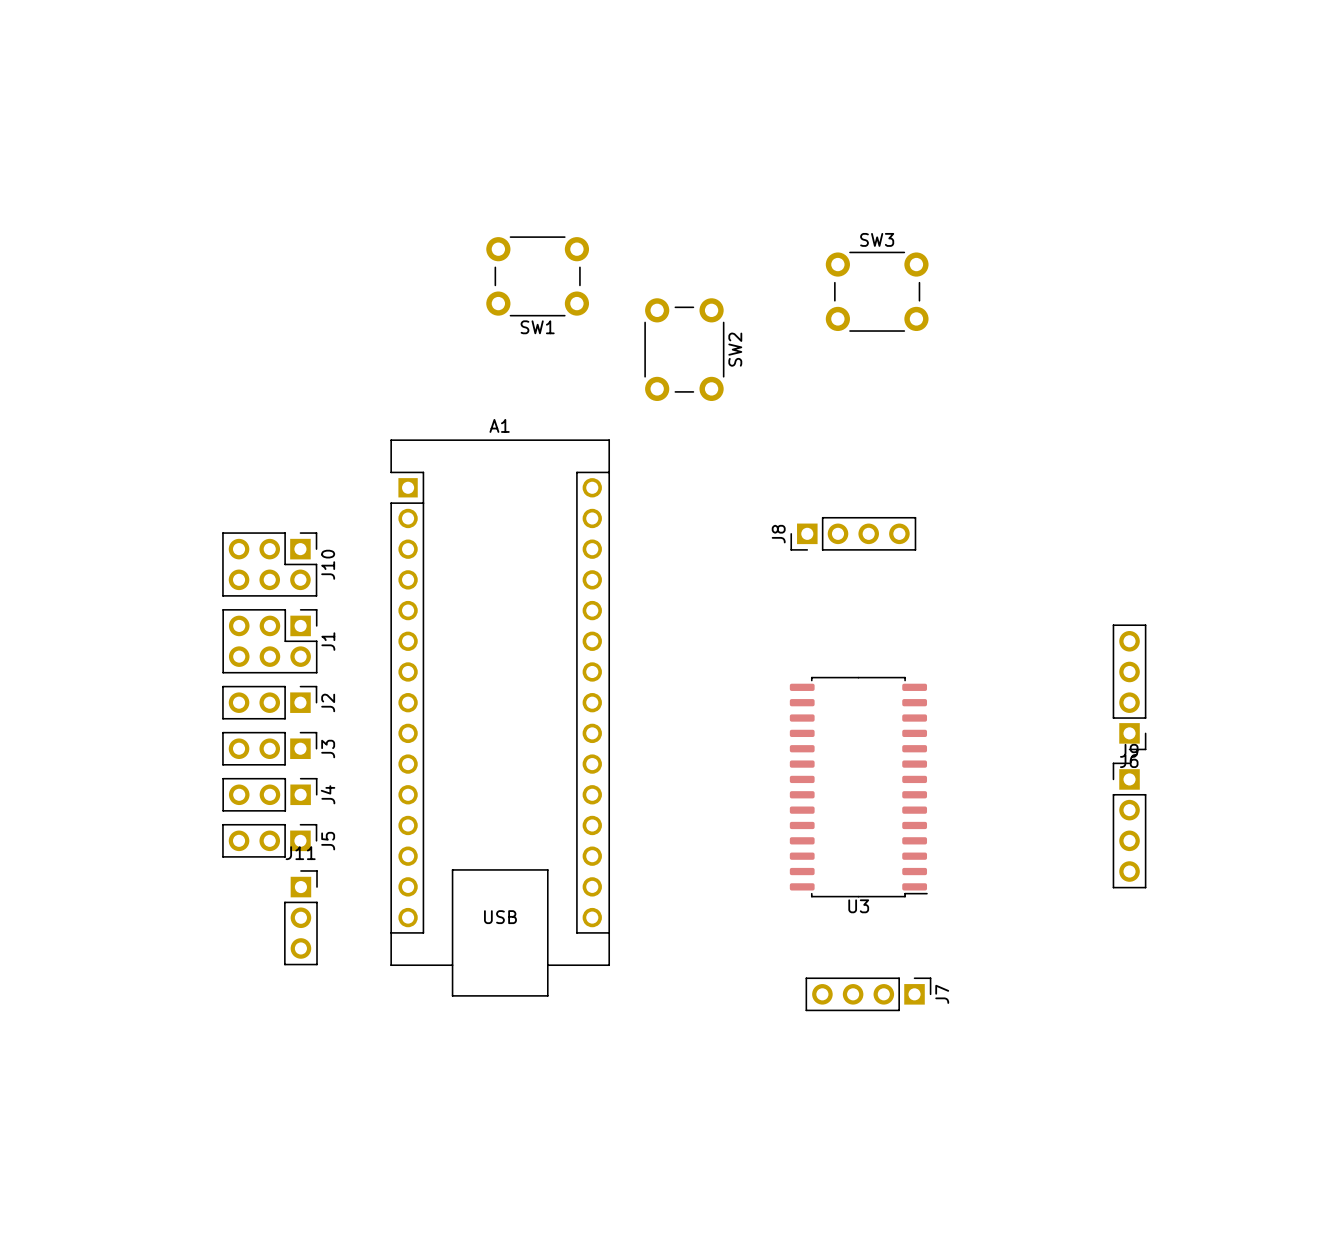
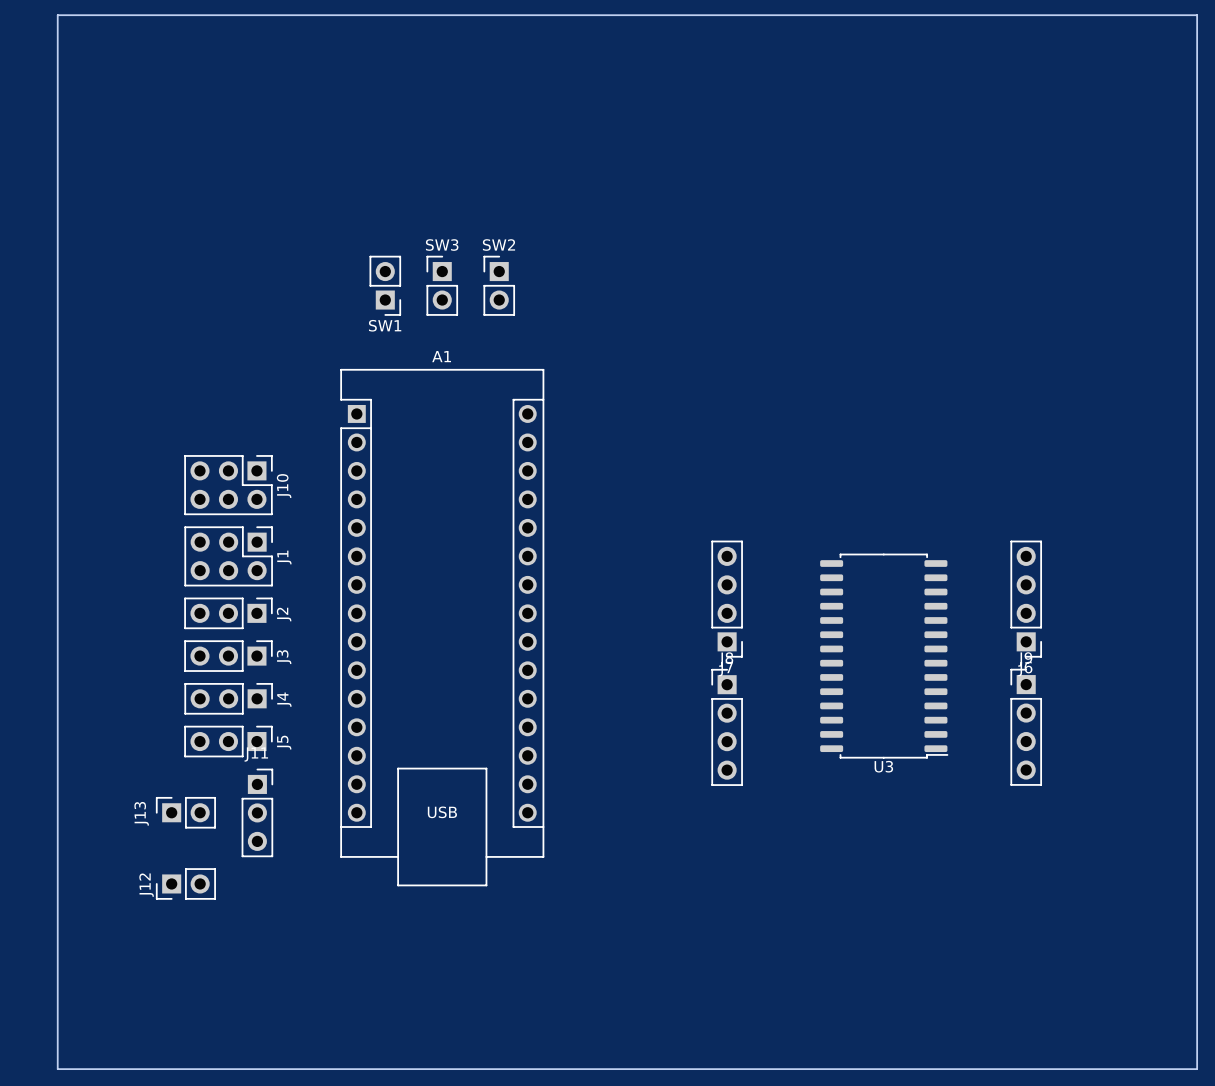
board edge: none -> (57, 15) (1197, 15) (1197, 1069) (57, 1069) (57, 15)
SW1 footprint: [486, 236, 590, 317] -> [369, 255, 401, 316]
SW3 footprint: [825, 251, 929, 332] -> [426, 255, 458, 316]
SW2 footprint: [644, 298, 725, 401] -> [483, 255, 515, 316]
SW2 name position: SW2 (735, 349) -> SW2 (498, 245)
J8 rotation: 0° (853, 533) -> 90° clockwise (727, 727)
J8 position: (853, 533) -> (727, 727)
U3 position: (858, 787) -> (884, 656)
J13: none -> (185, 812)
J12: none -> (185, 883)
J7 rotation: 0° (868, 994) -> 90° clockwise (727, 599)
J7 position: (868, 994) -> (727, 599)

